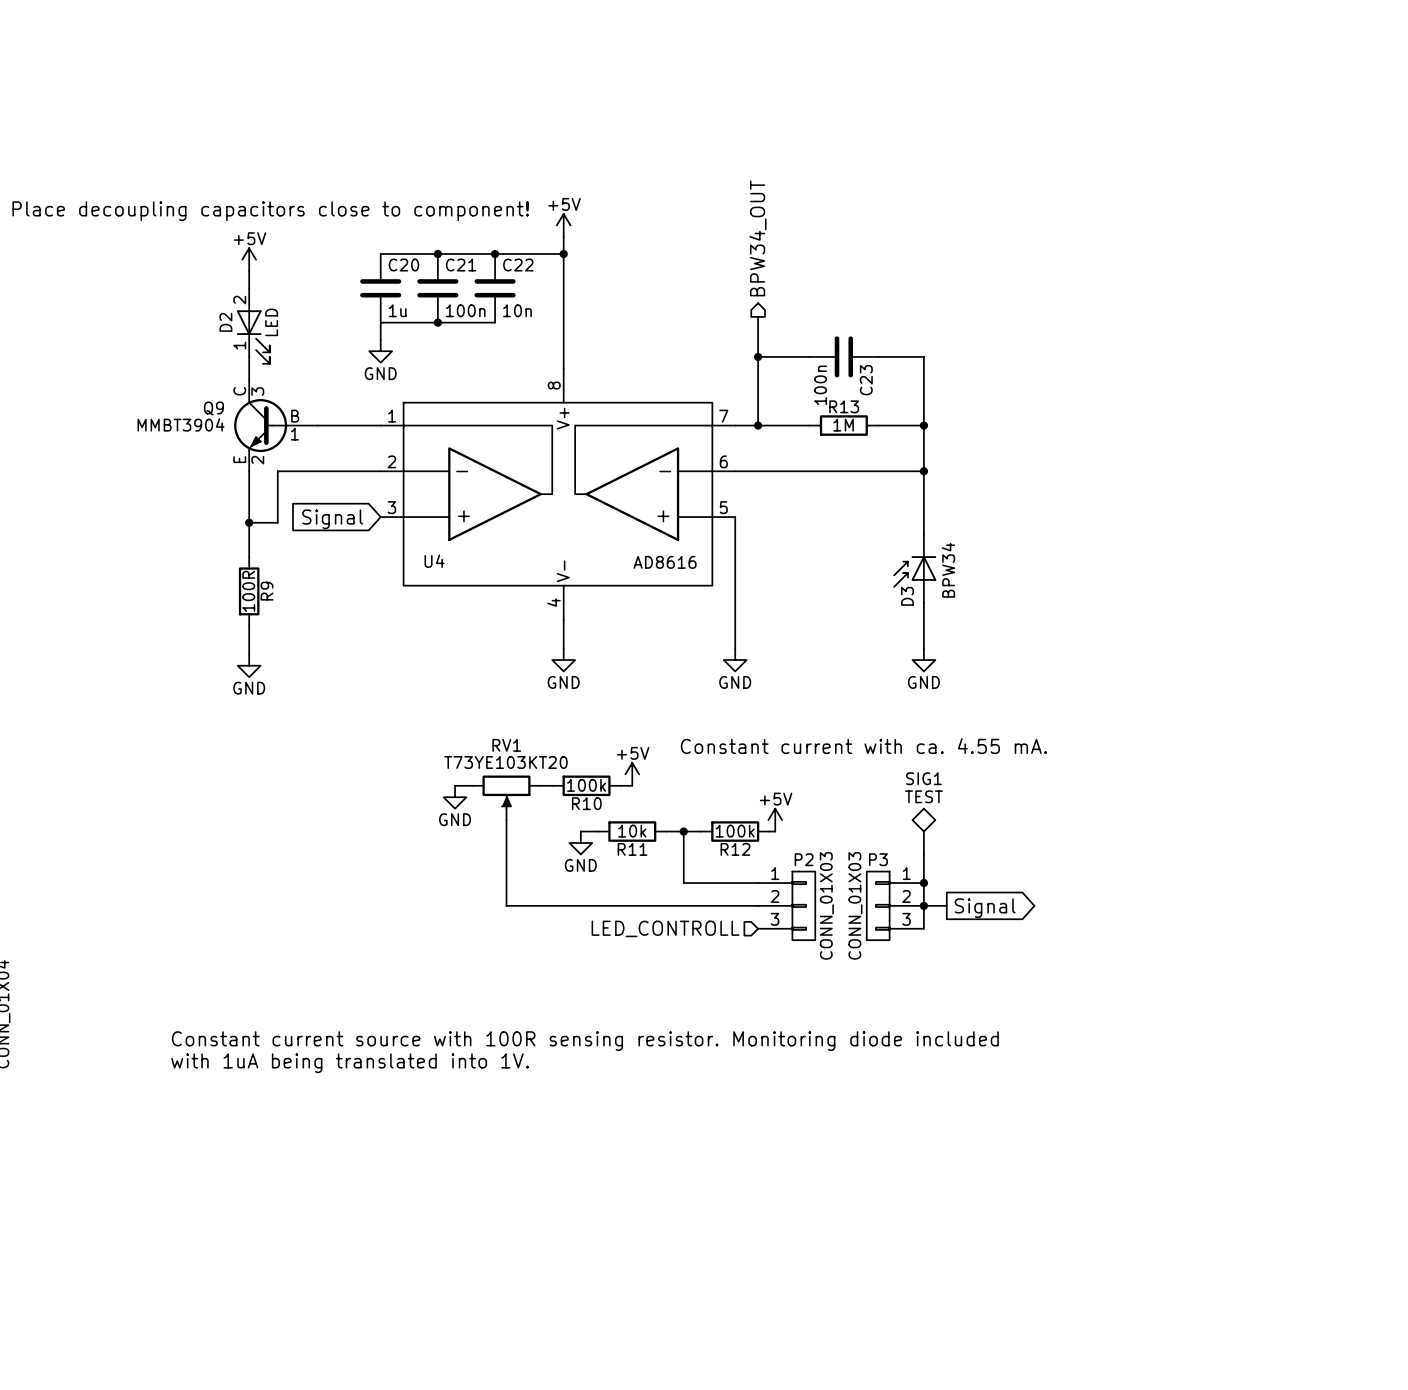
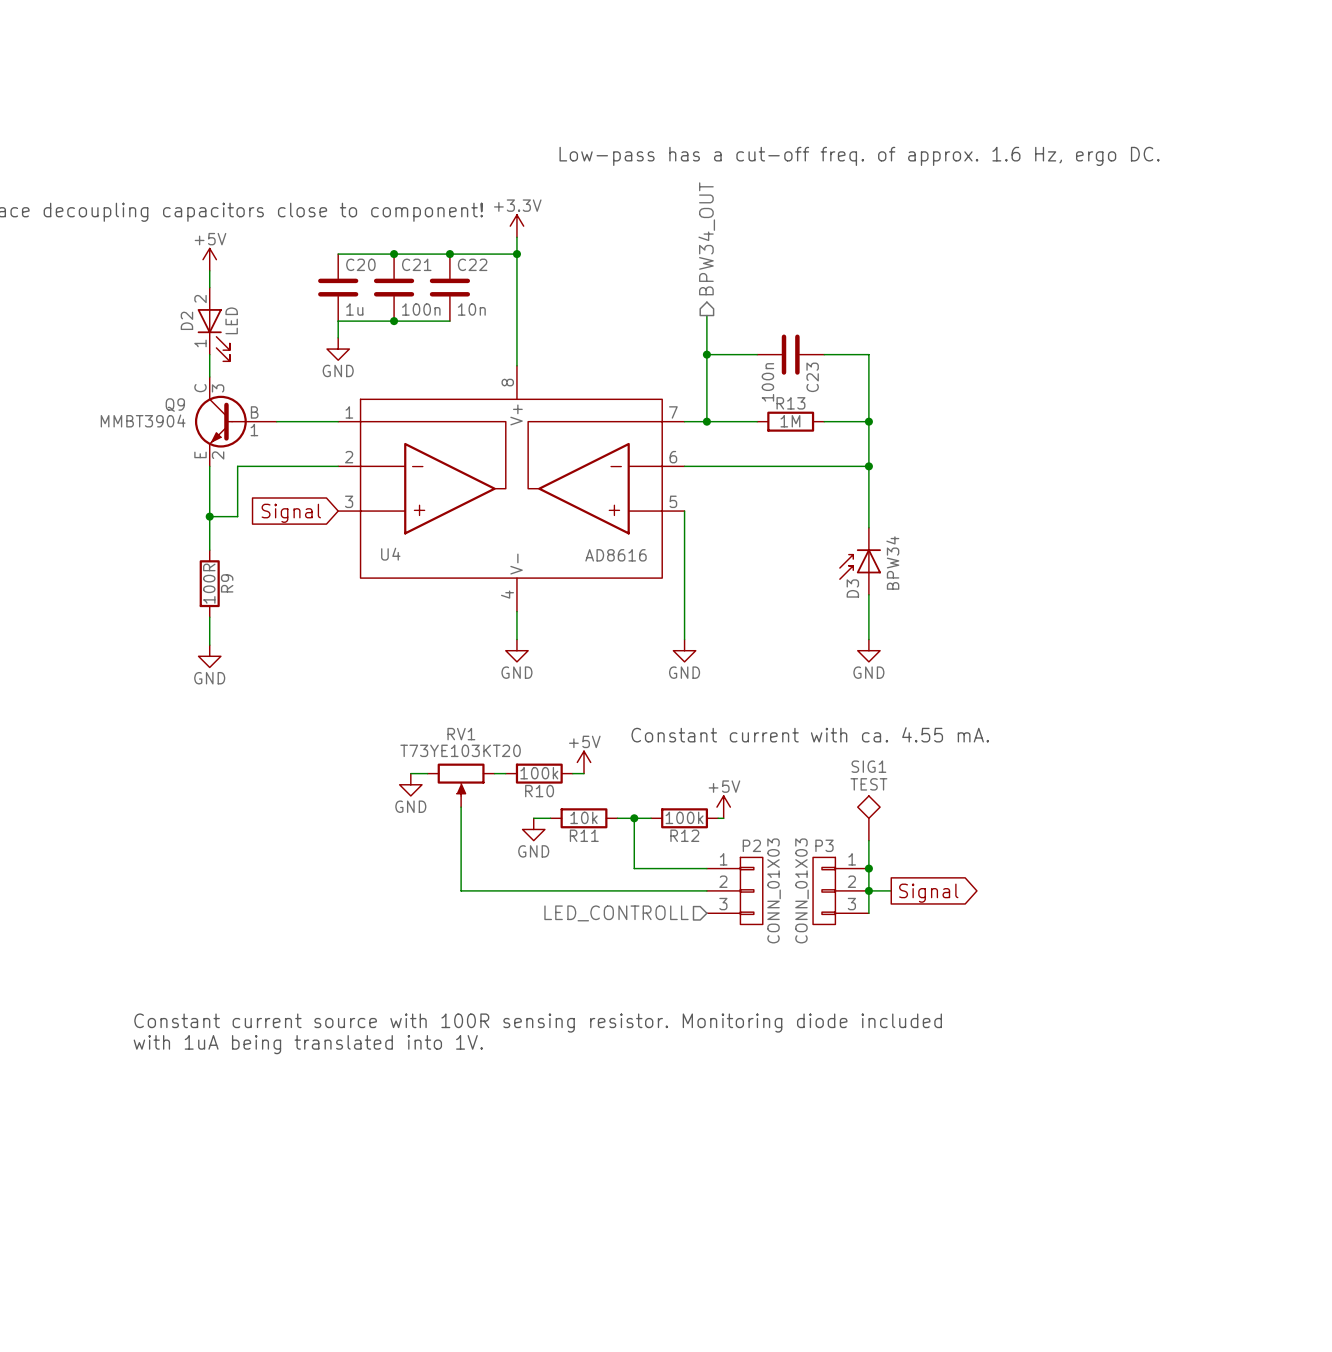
text: none -> Low-pass has a cut-off freq. of approx. 1.6 Hz, ergo DC. (859, 156)
power symbol: +5V (563, 225) -> +3.3V (516, 226)

